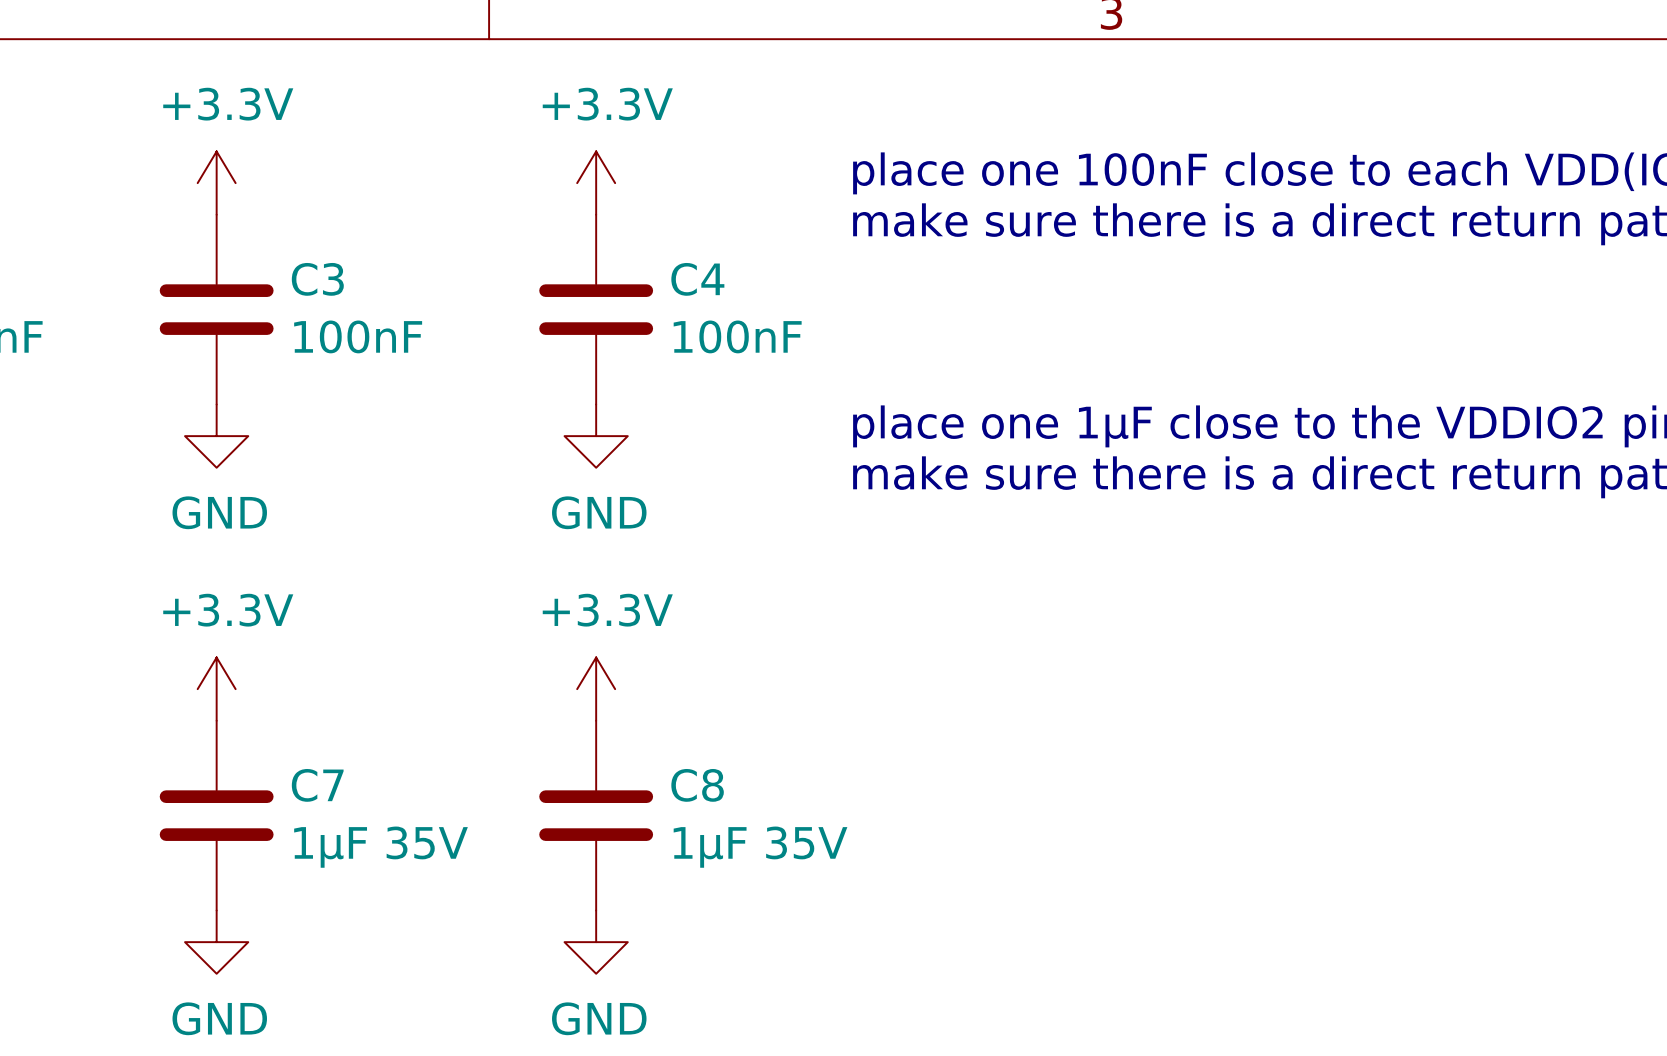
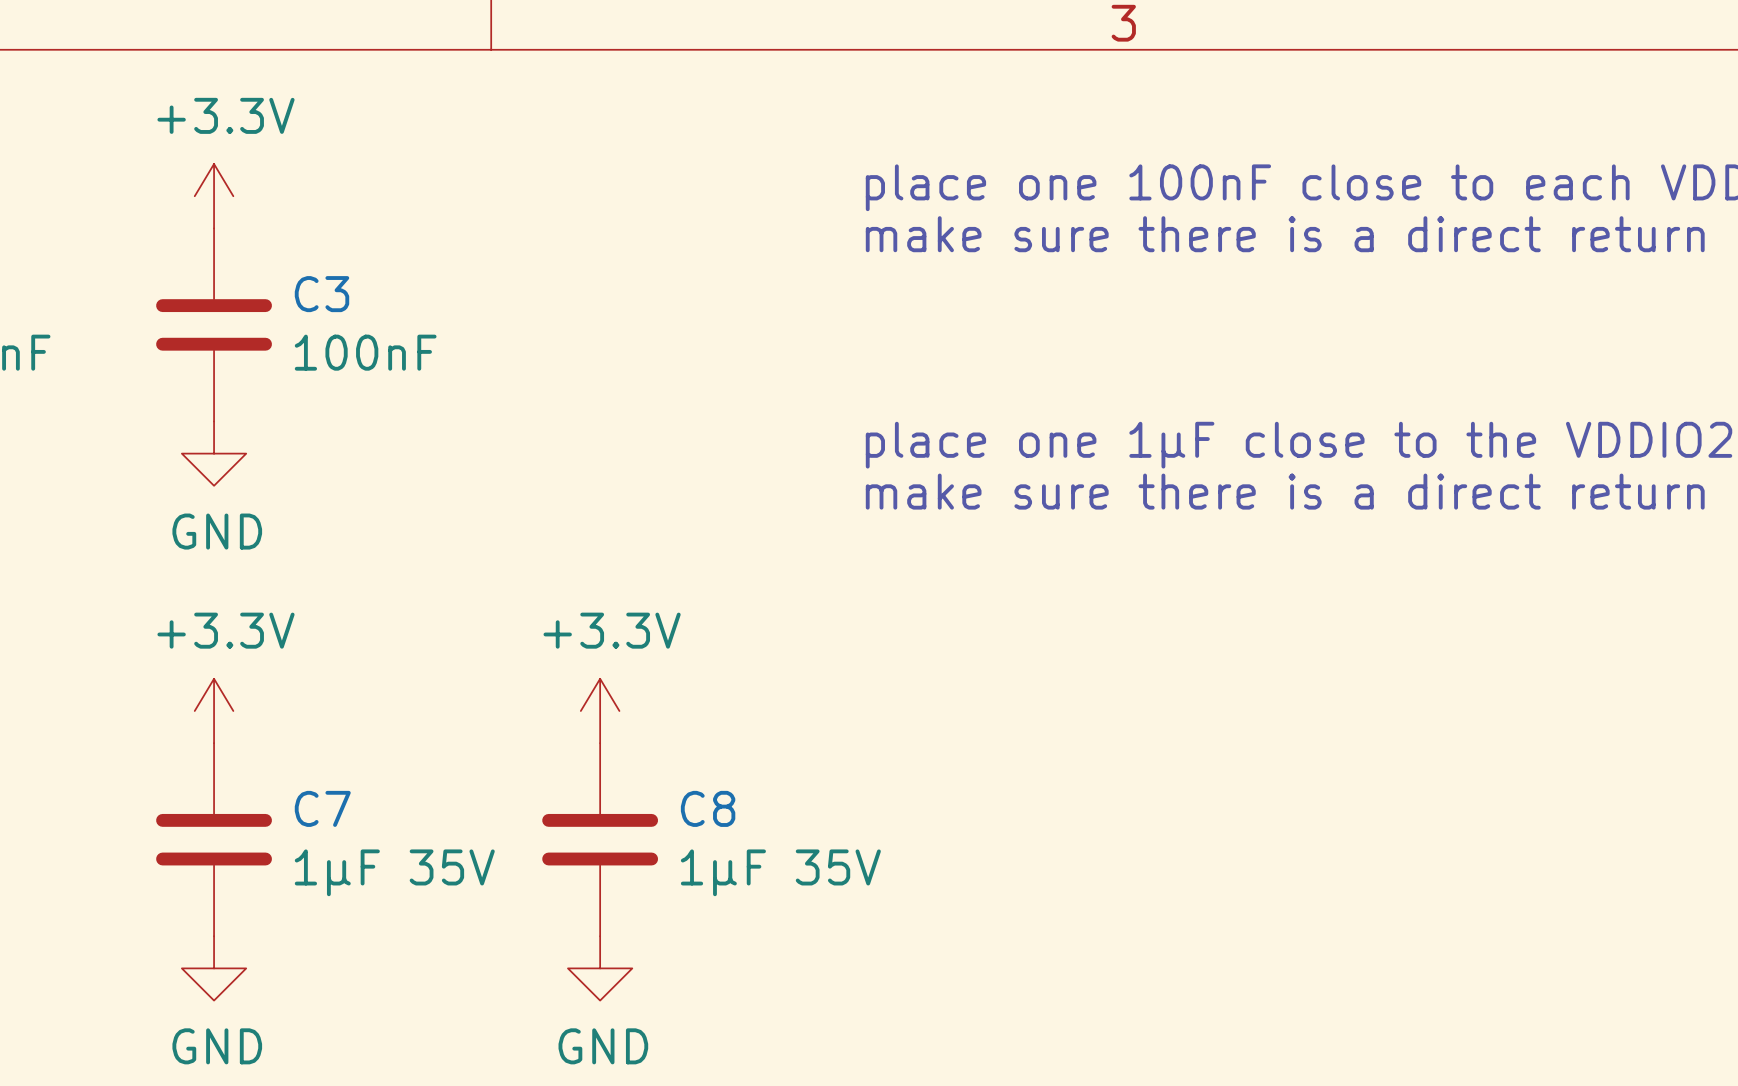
power symbol: +3.3V (596, 183) -> none
C4: 100nF (596, 309) -> none
power symbol: GND (596, 436) -> none

